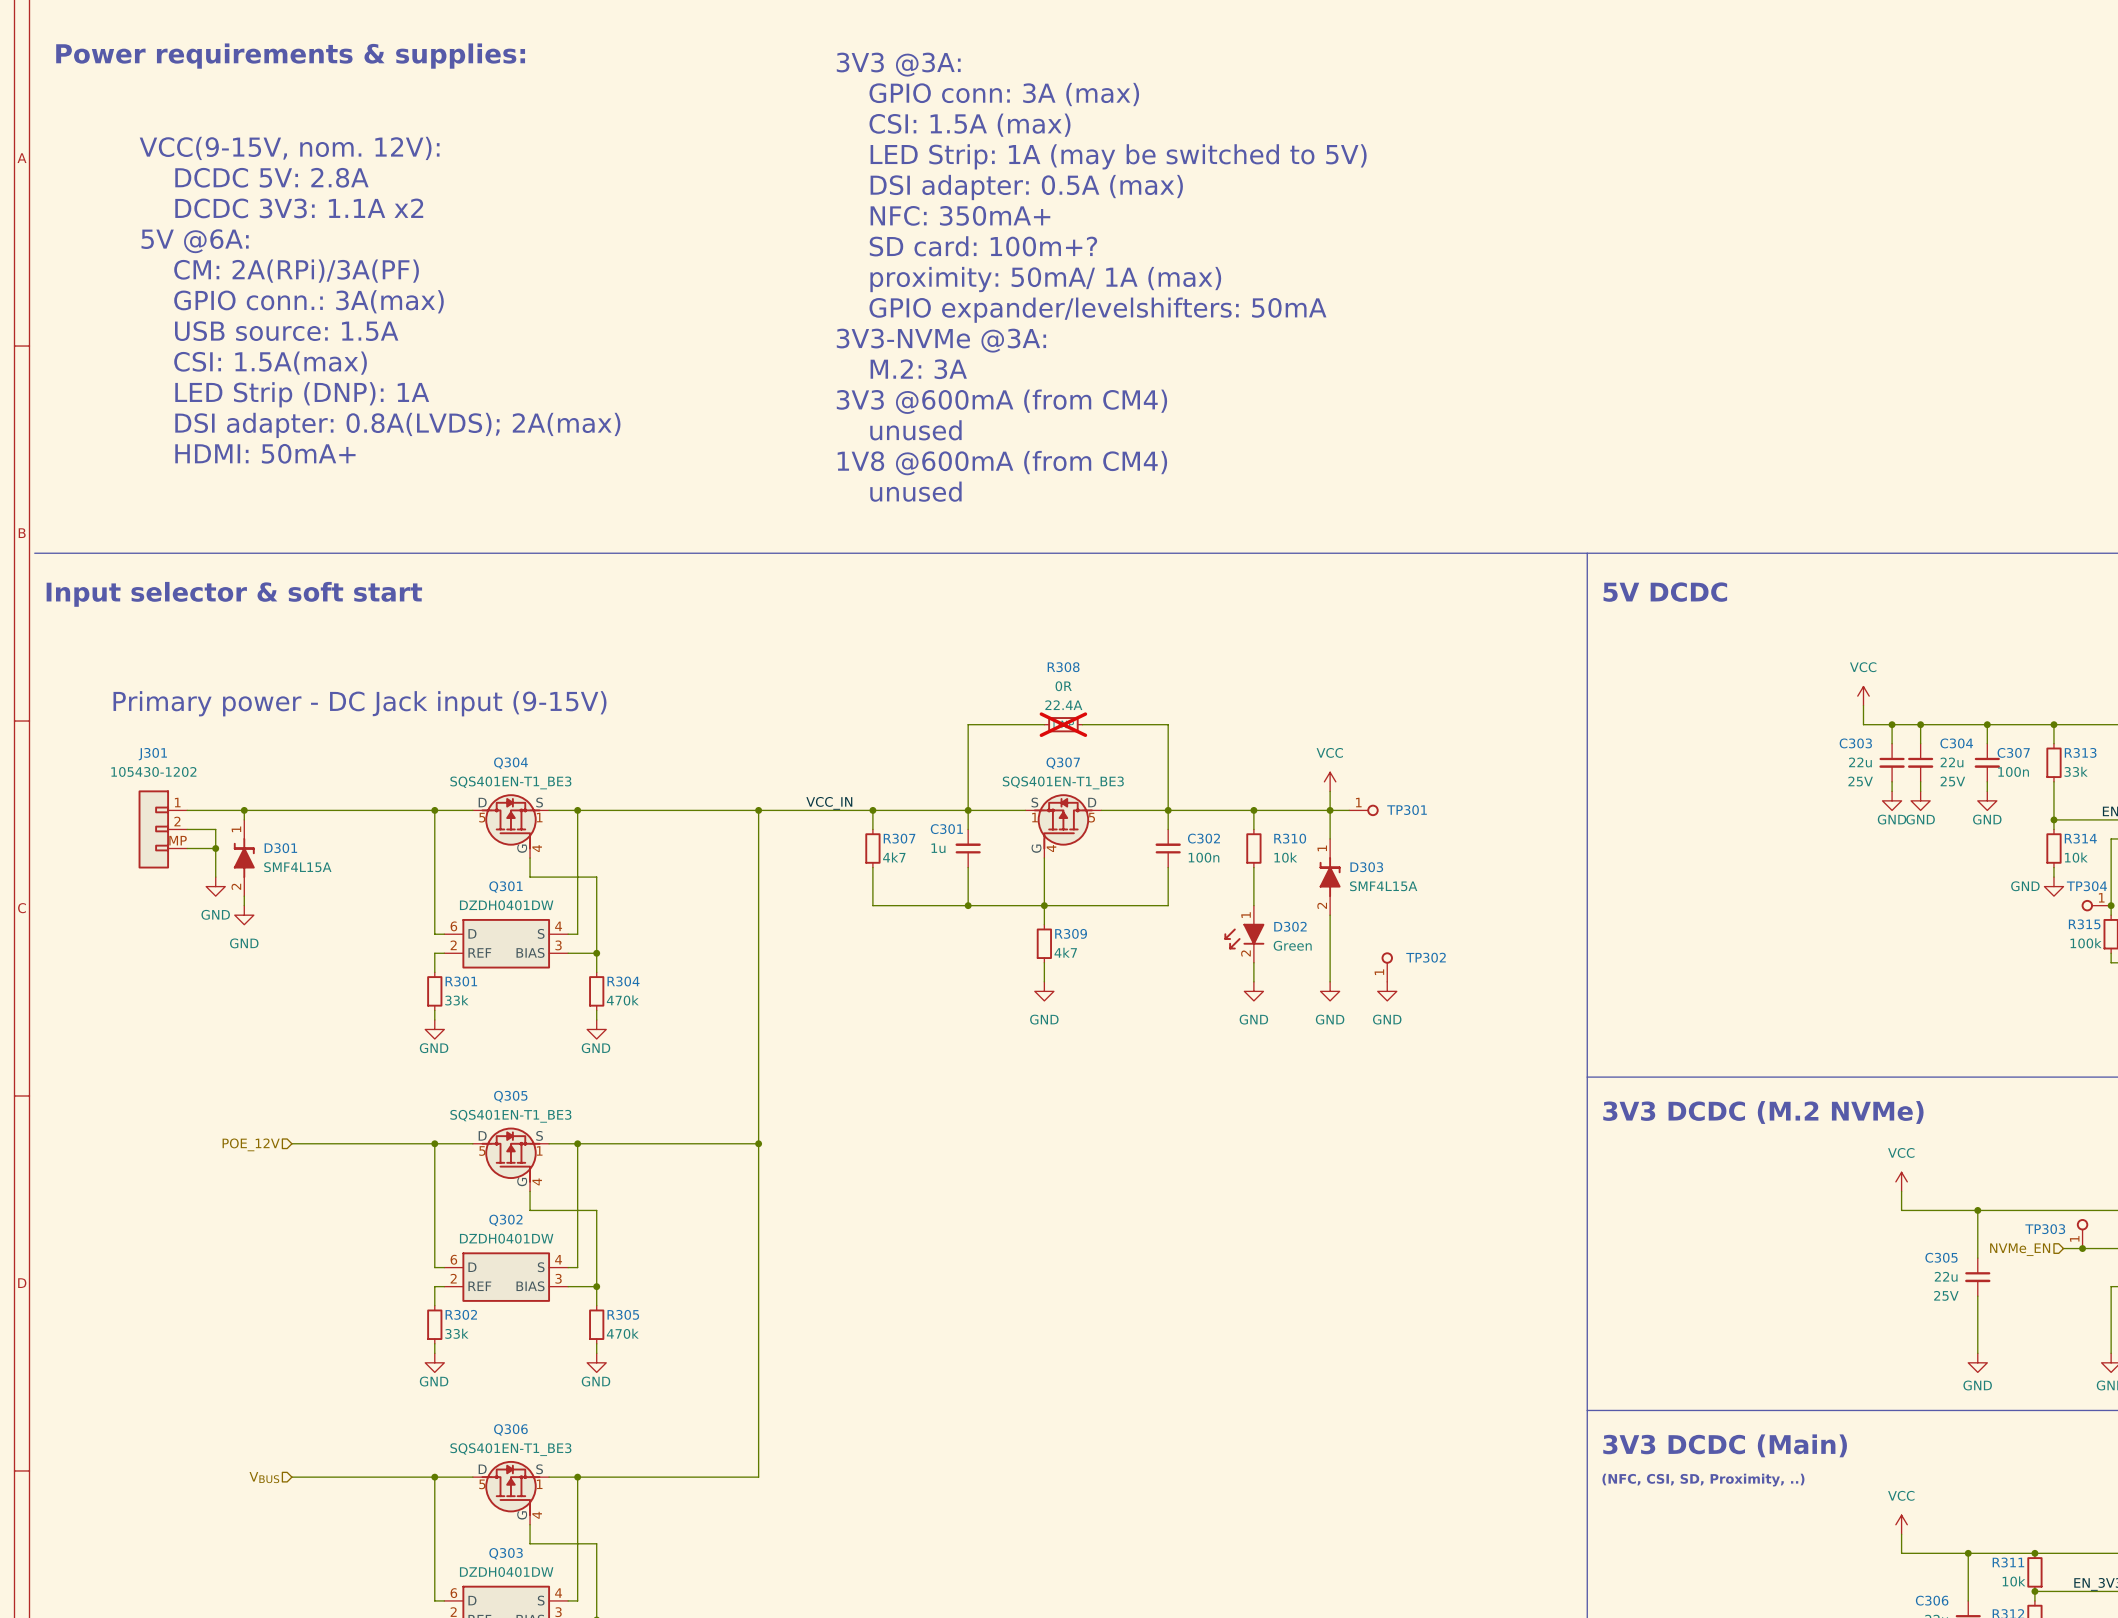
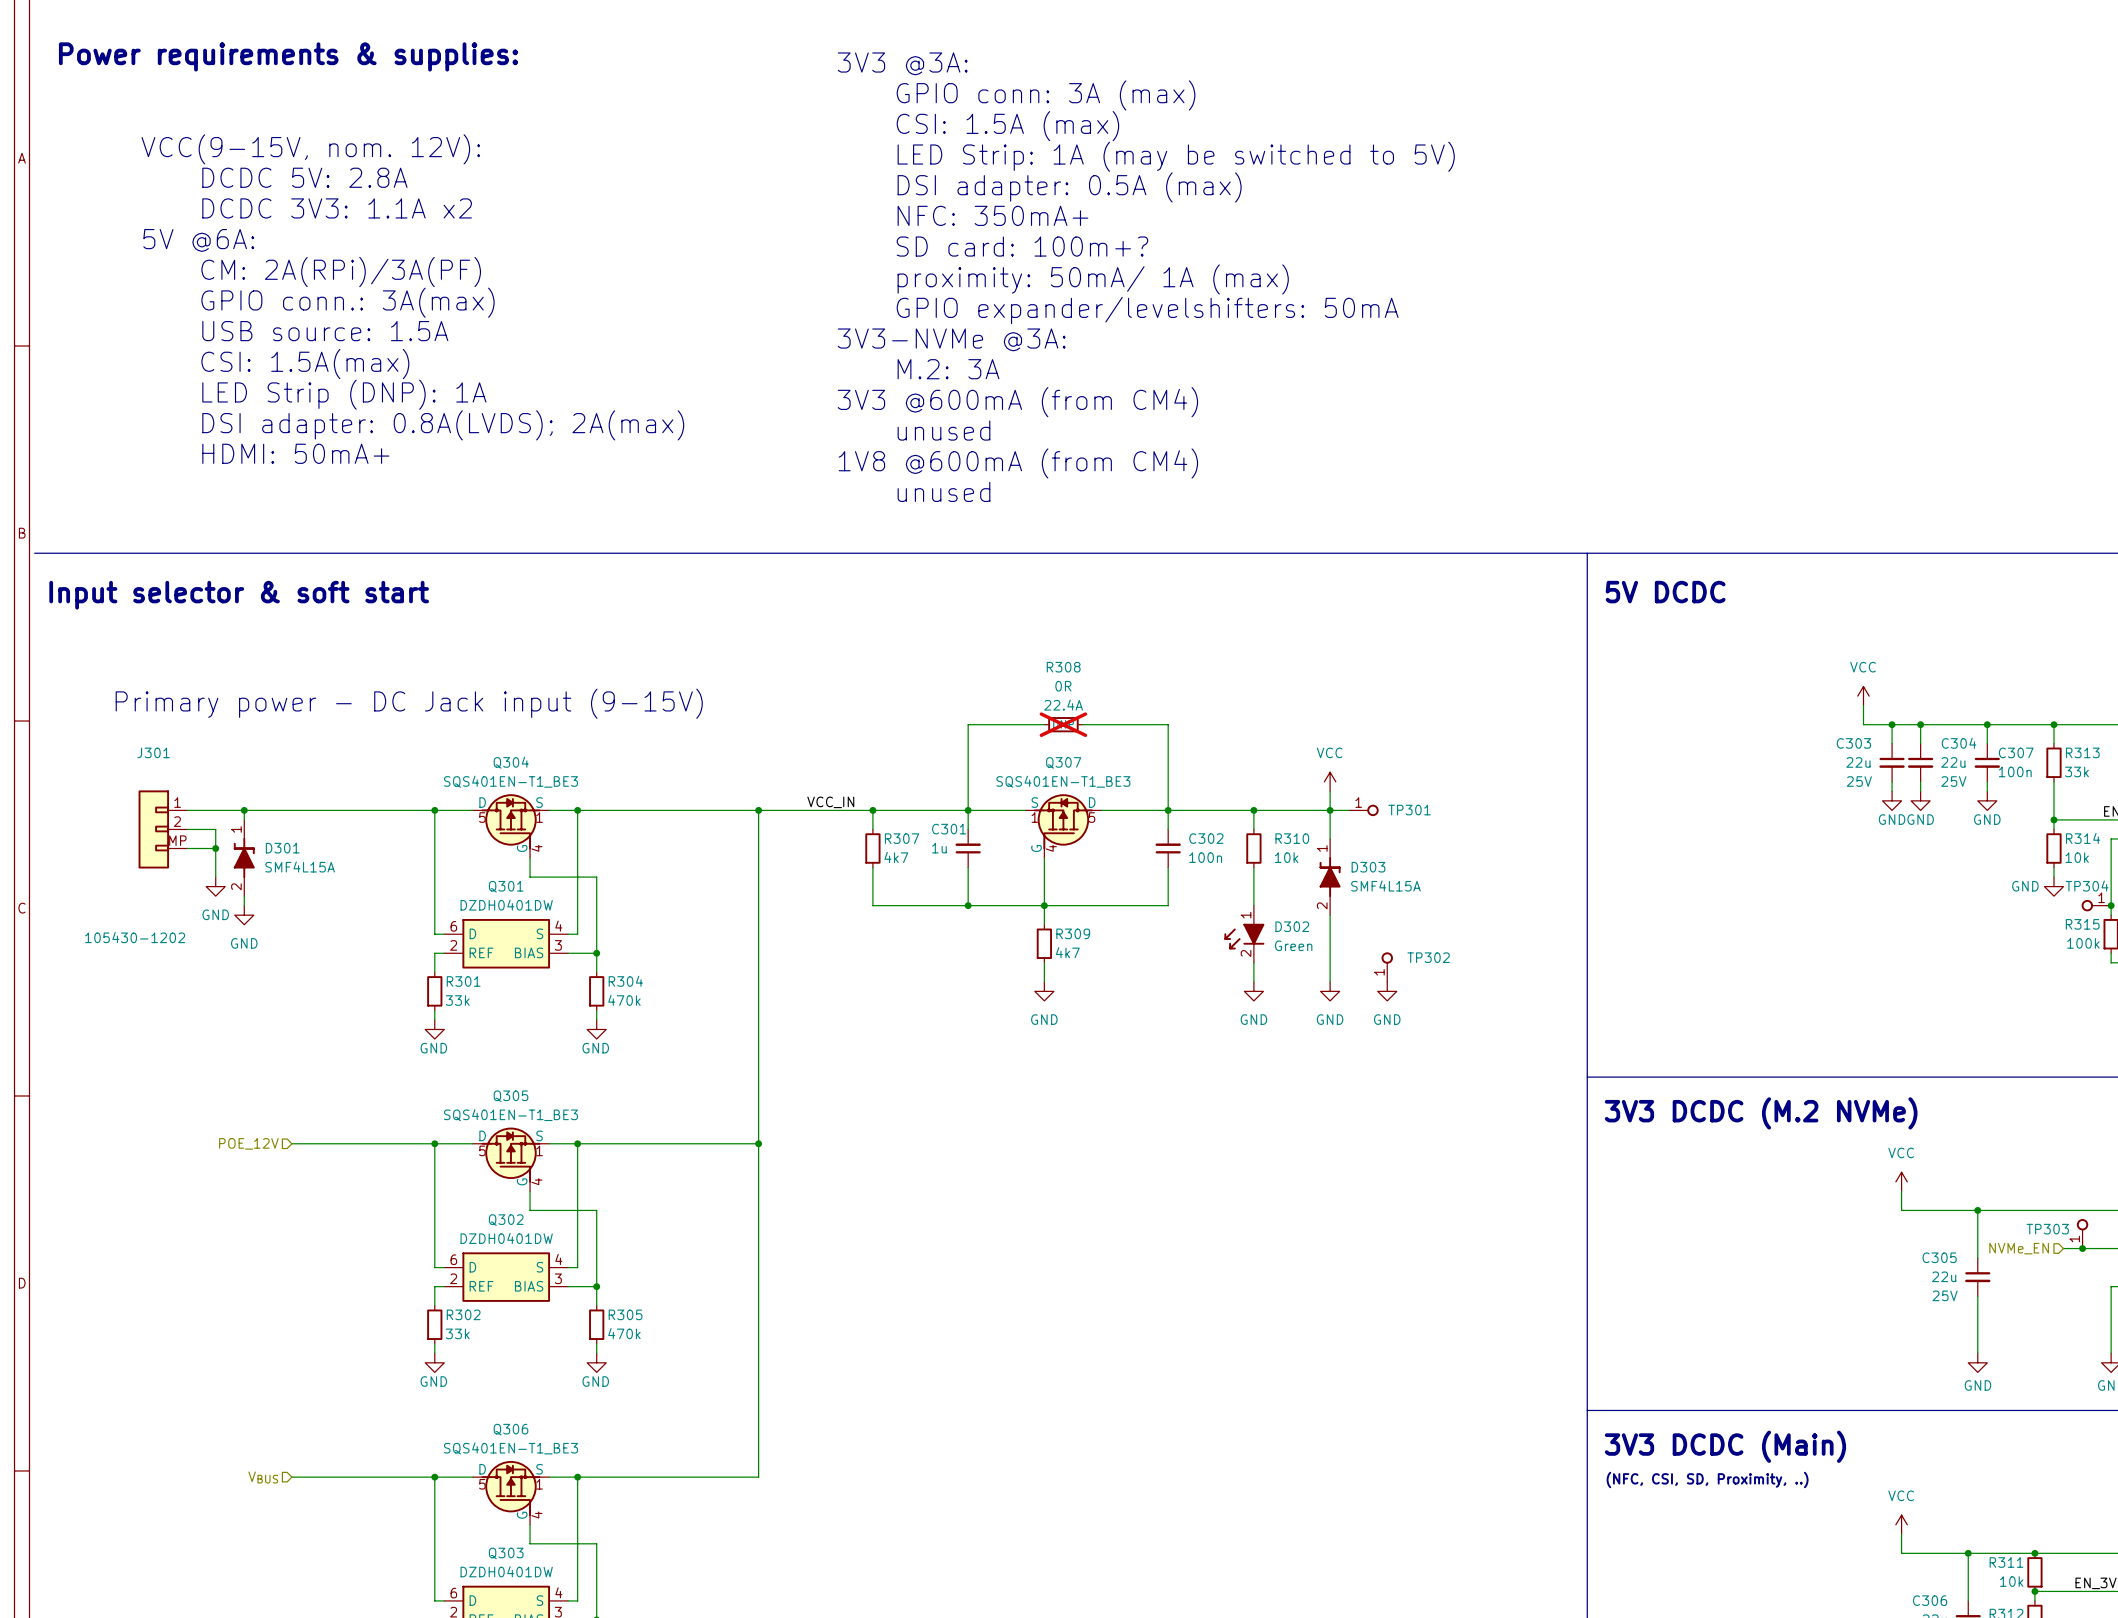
J301 text position: 105430-1202 (153, 771) -> 105430-1202 (135, 937)

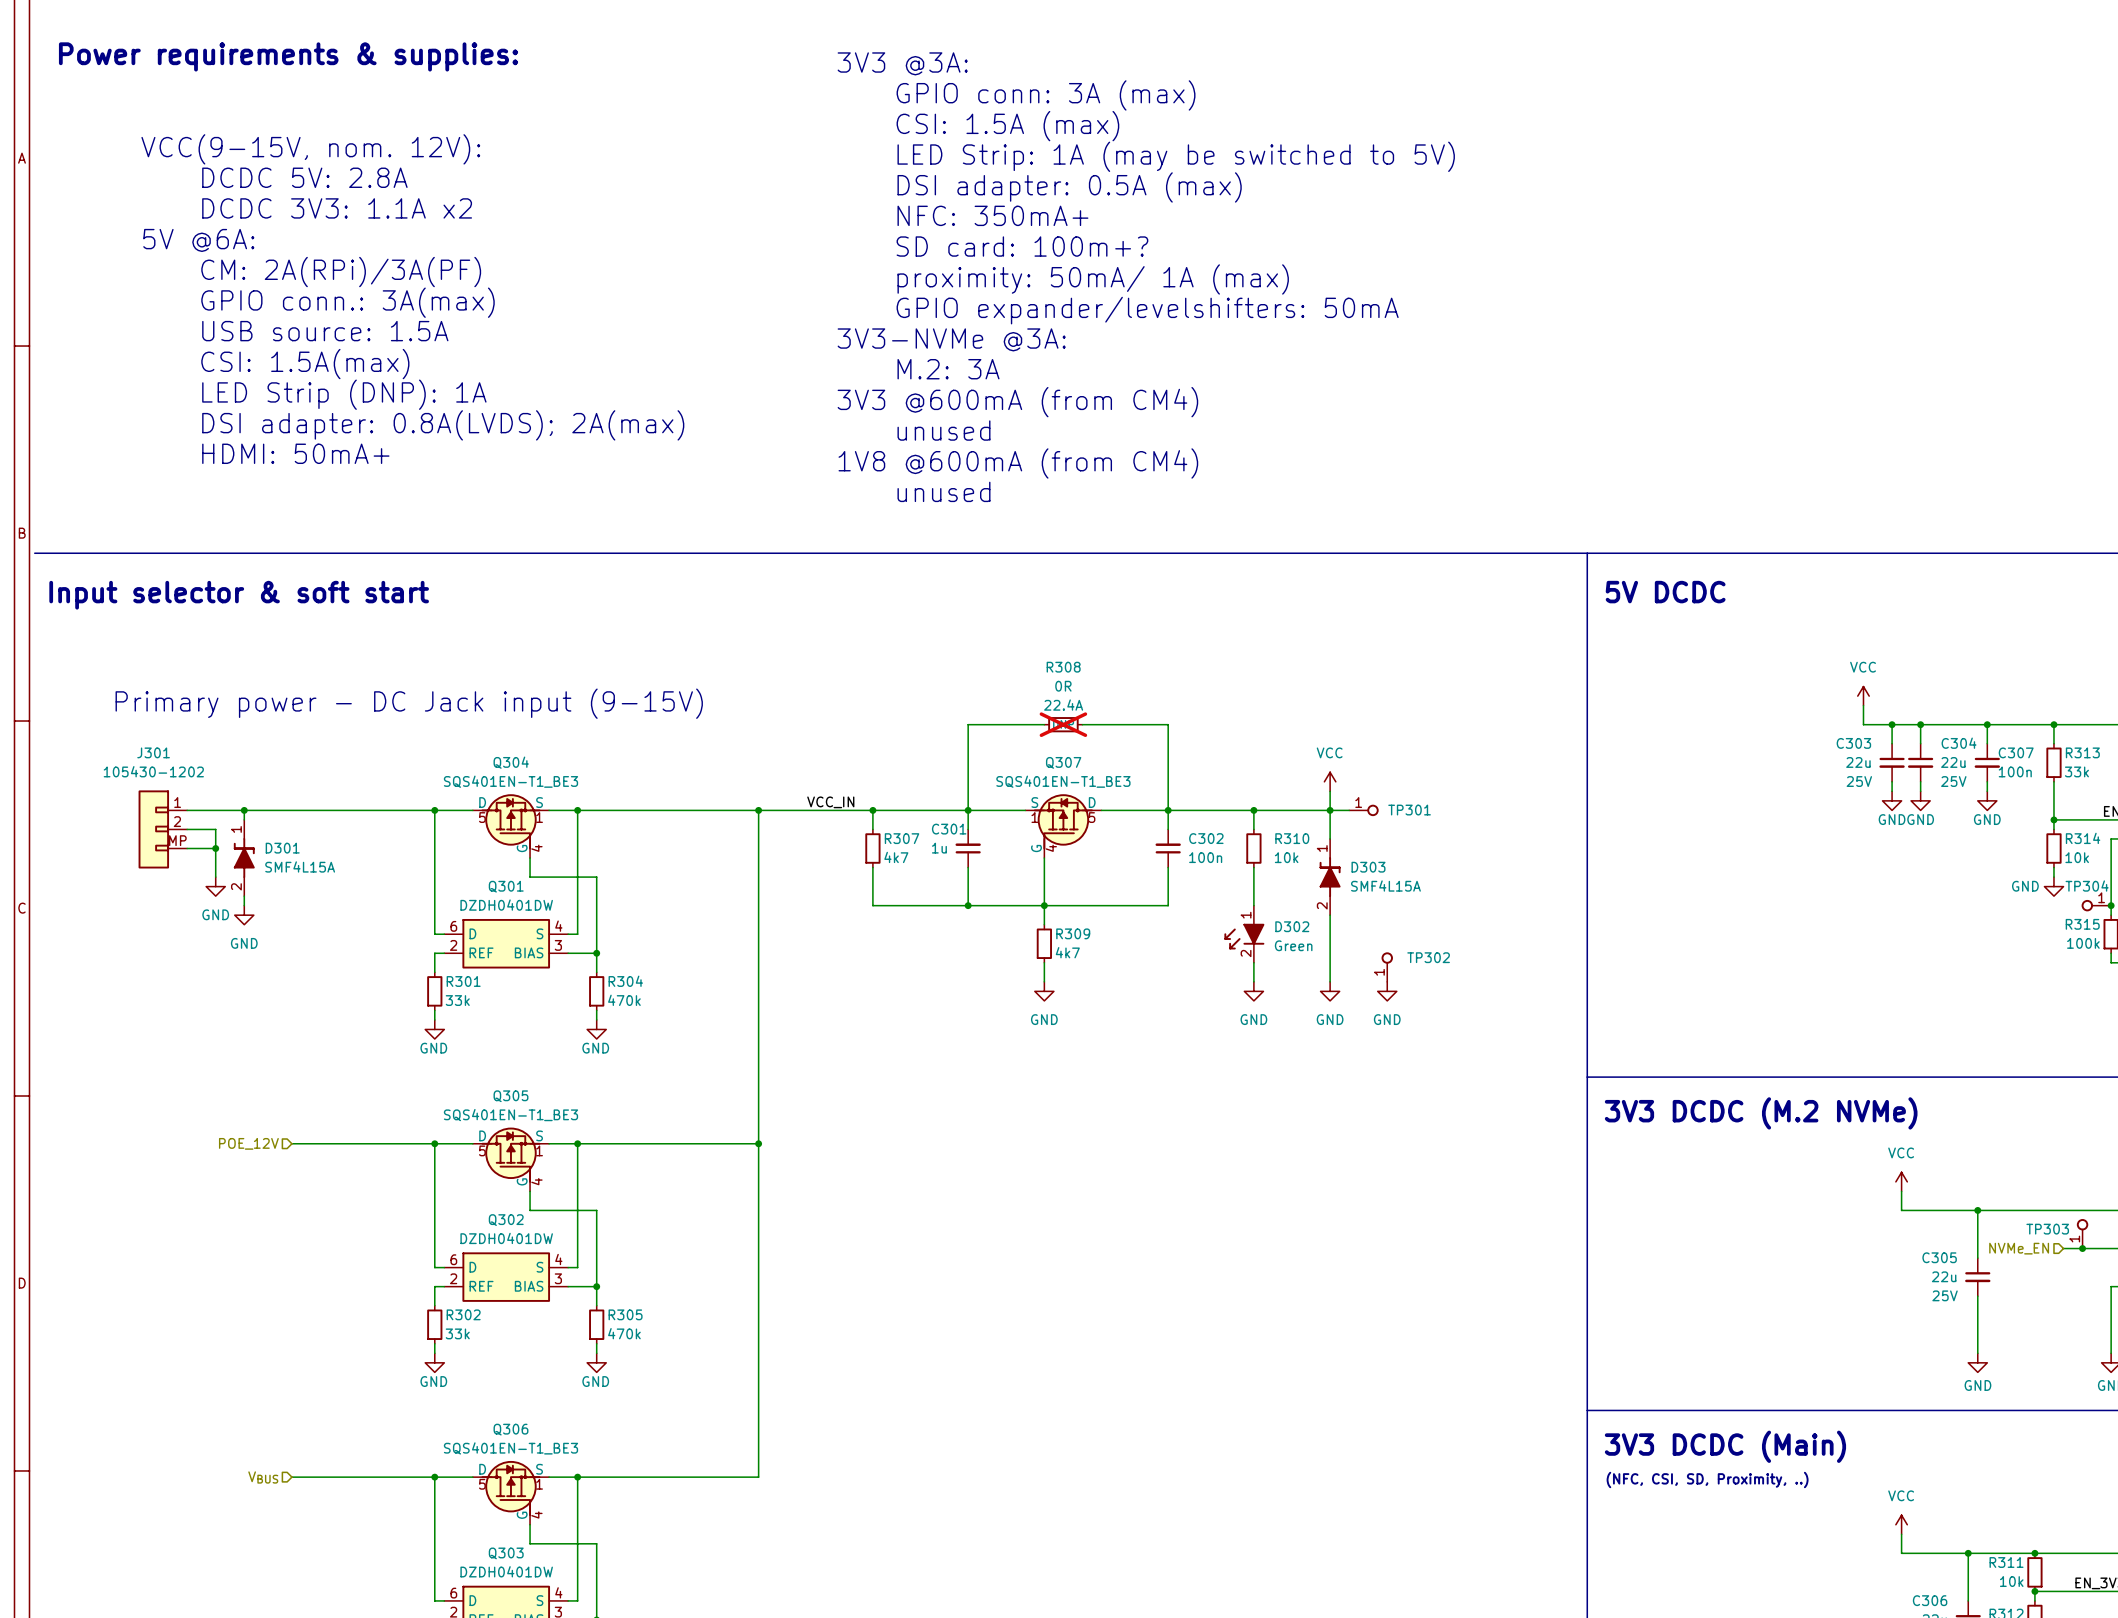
J301 text position: 105430-1202 (135, 937) -> 105430-1202 (153, 771)

